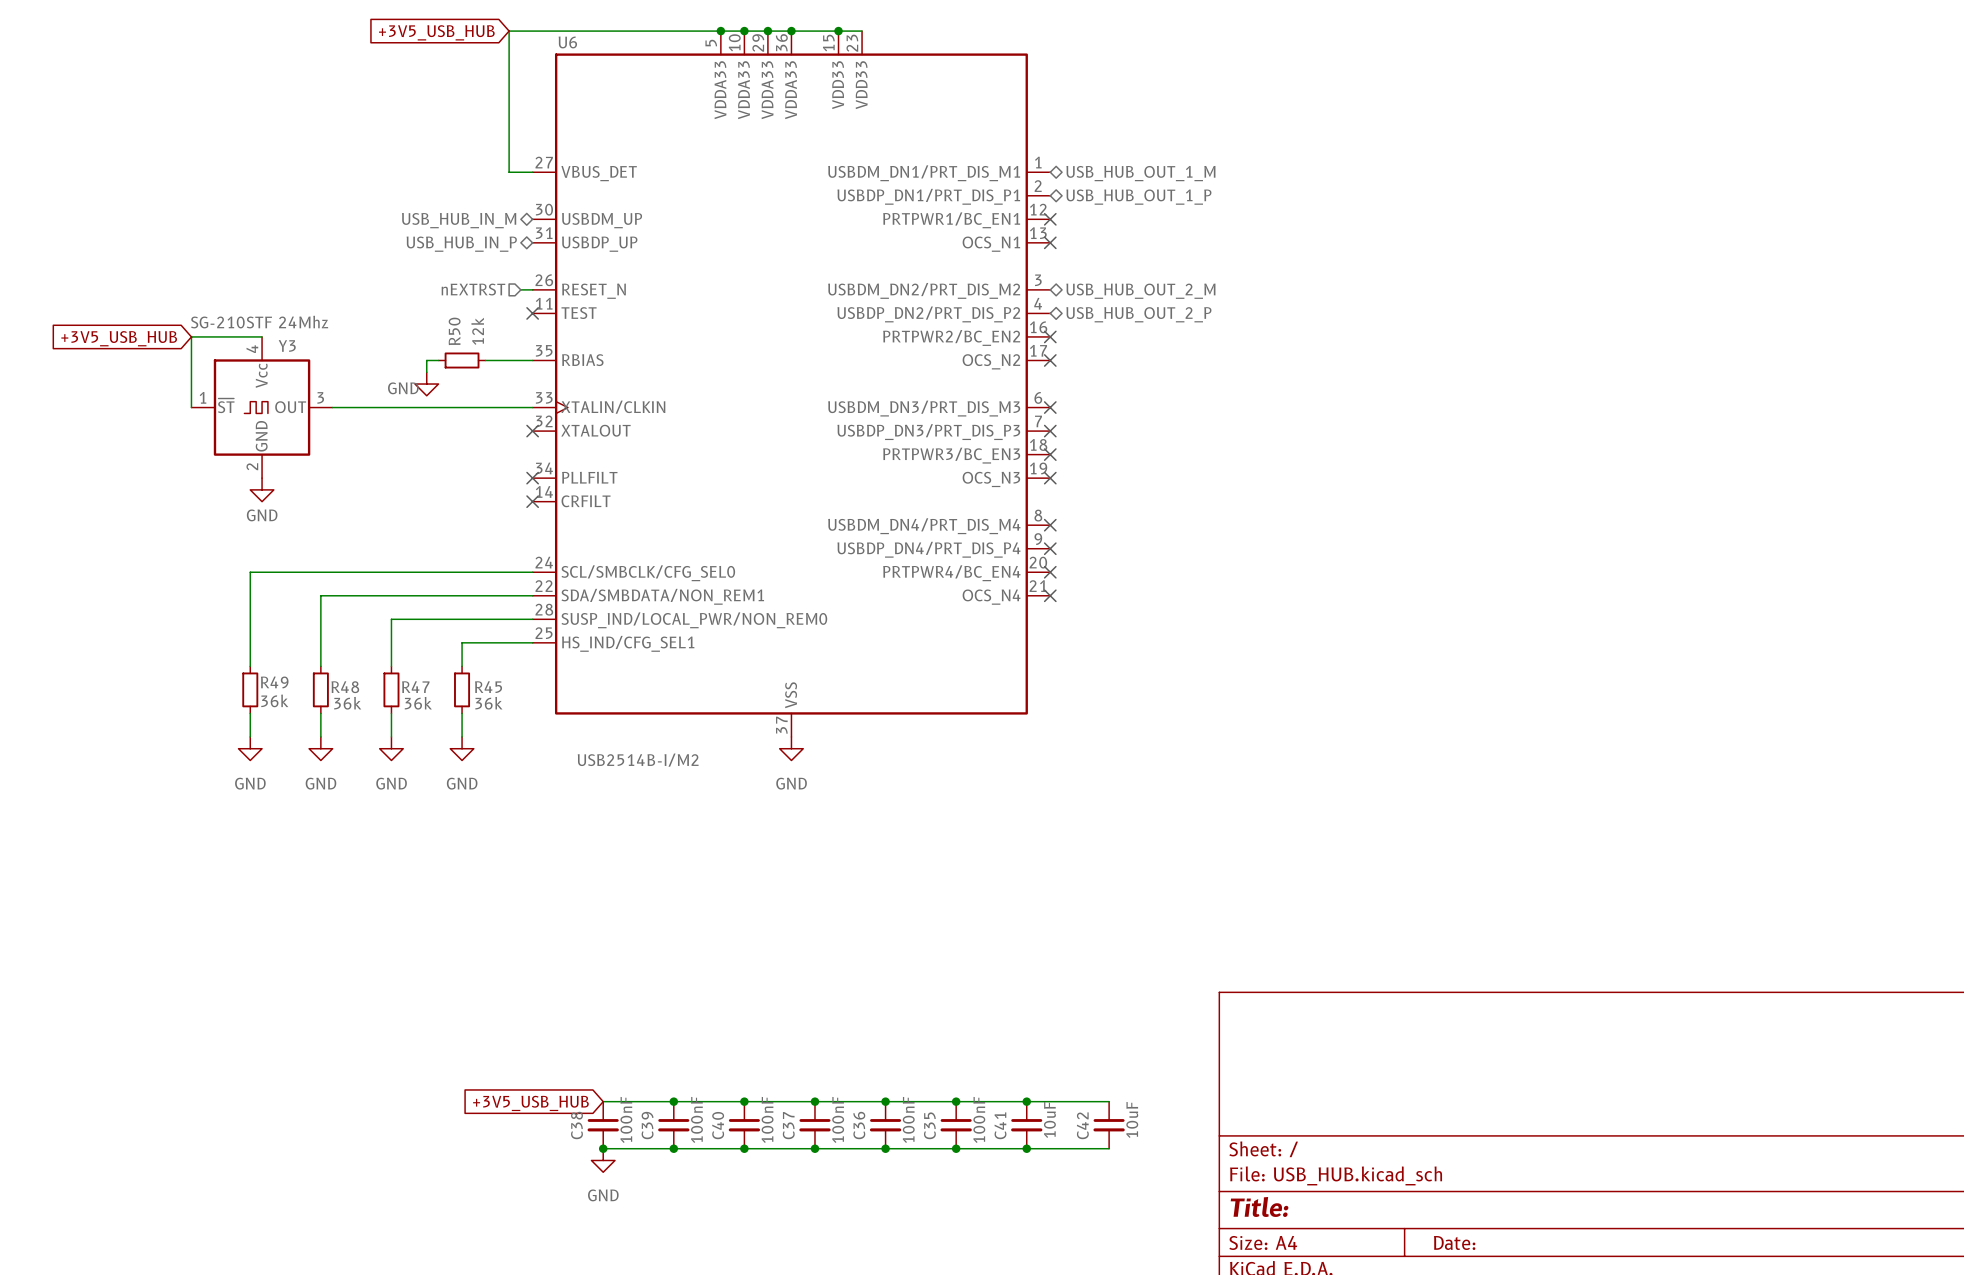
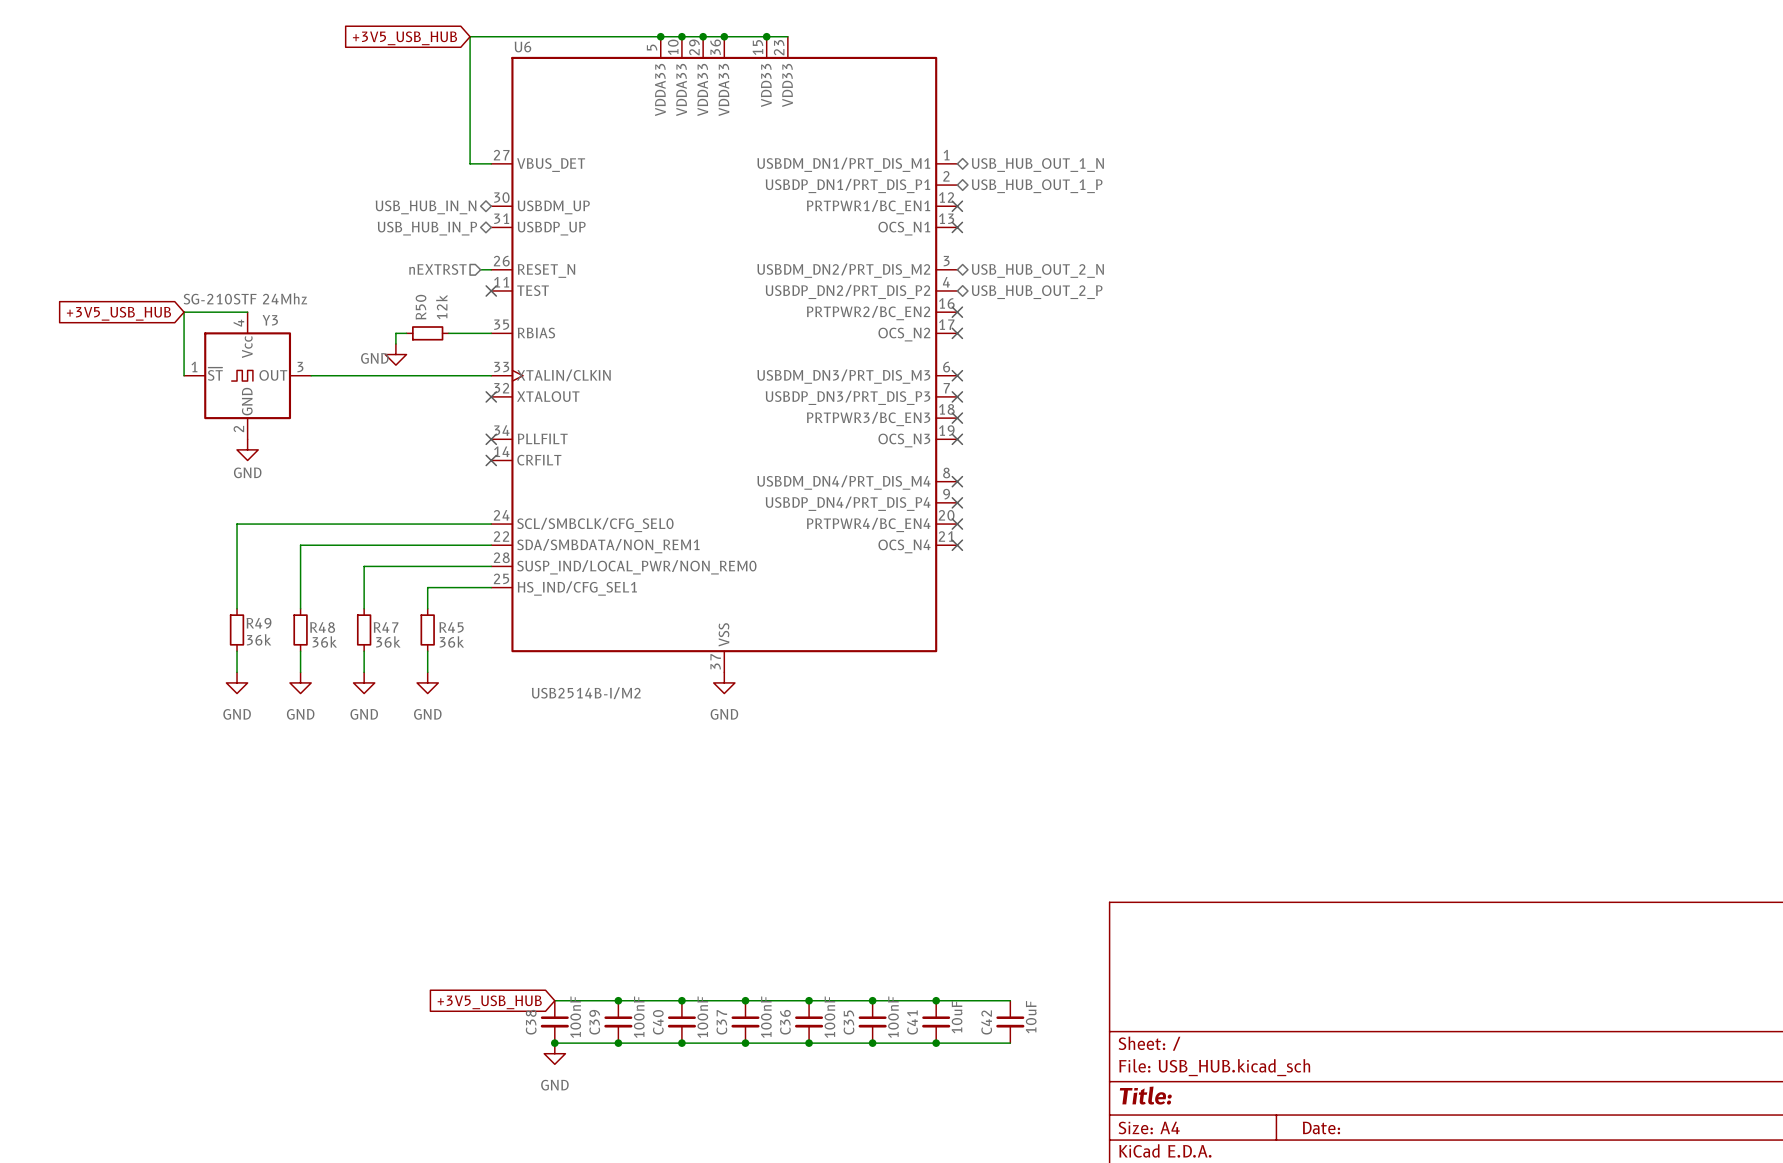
hierarchical label: USB_HUB_OUT_1_M (1140, 173) -> USB_HUB_OUT_1_N (1037, 165)
hierarchical label: USB_HUB_IN_M (459, 220) -> USB_HUB_IN_N (426, 207)
hierarchical label: USB_HUB_OUT_2_M (1140, 291) -> USB_HUB_OUT_2_N (1037, 270)

